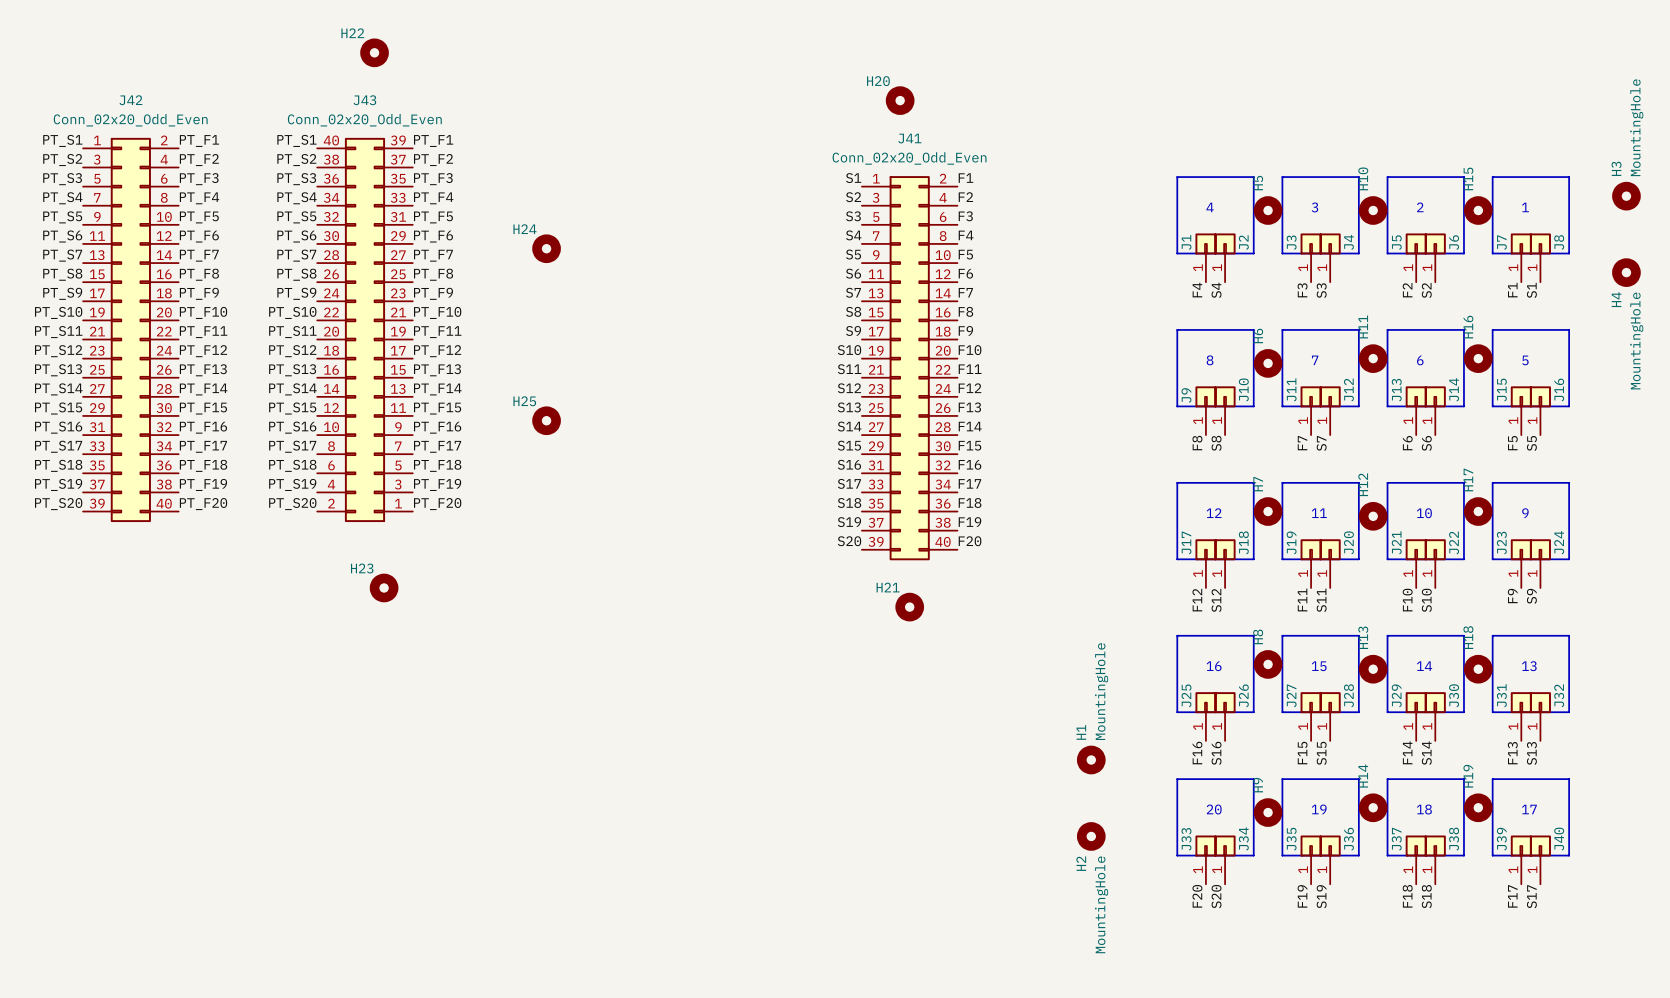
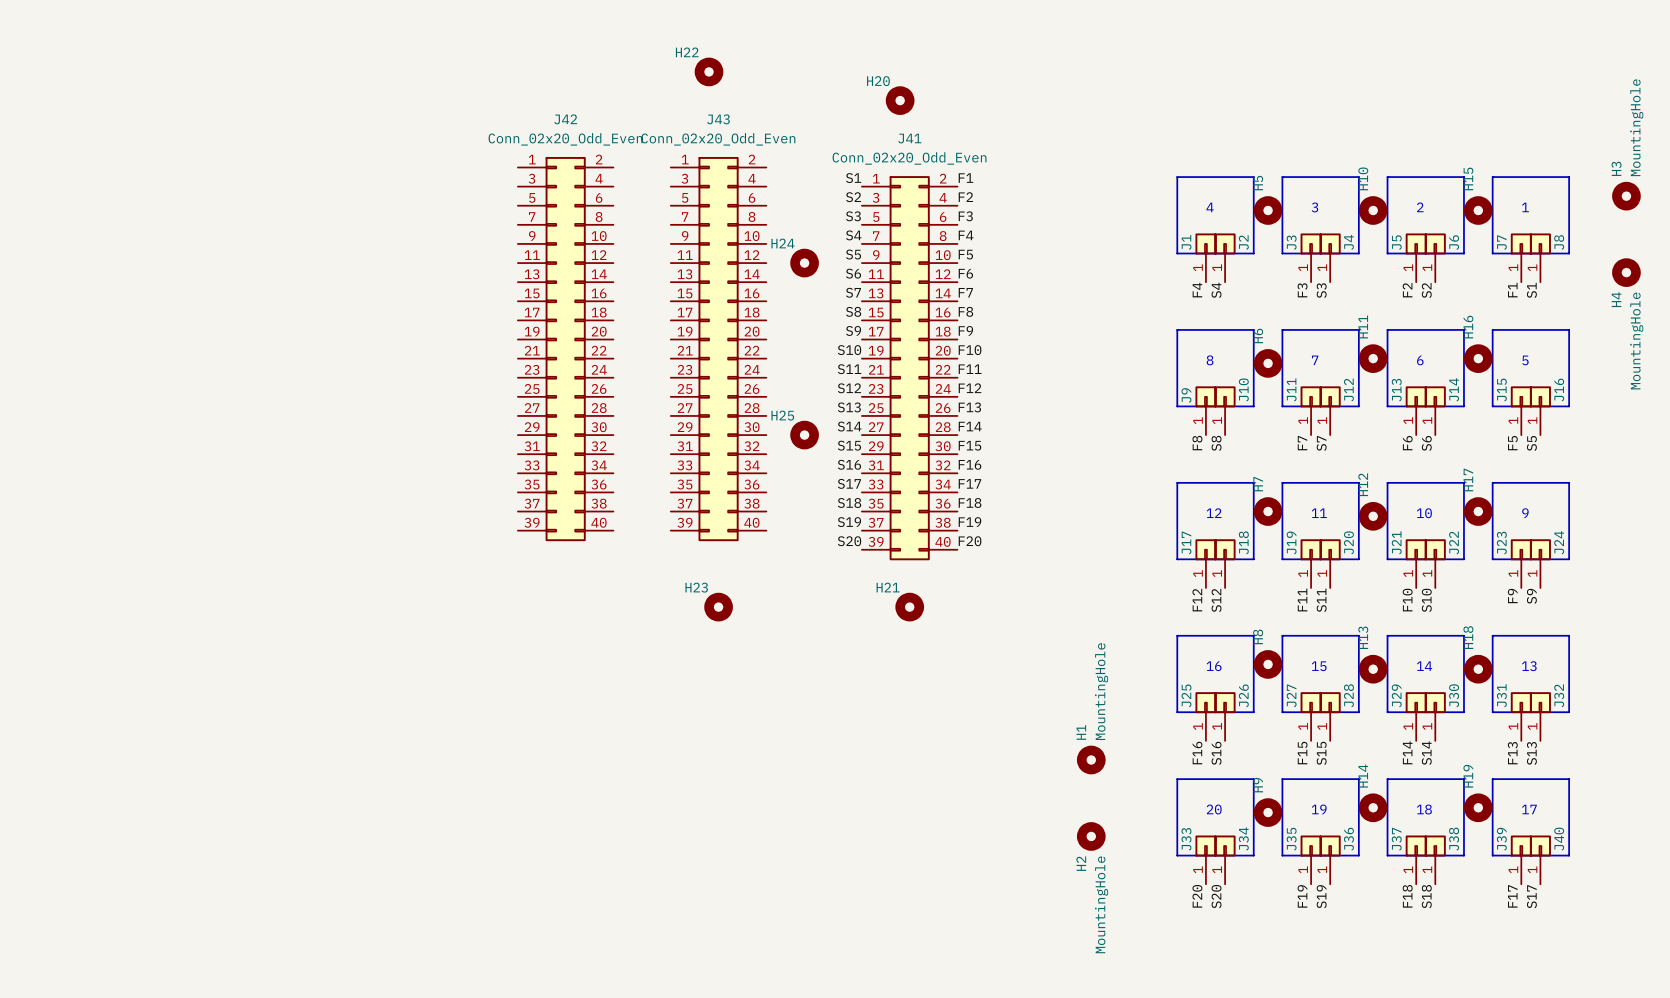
H22 position: (374, 52) -> (709, 71)
label: PT_S1 (62, 140) -> none
label: PT_S1 (296, 140) -> none
label: PT_F1 (199, 141) -> none
label: PT_F1 (433, 141) -> none
label: PT_S2 (62, 160) -> none
label: PT_F2 (199, 160) -> none
label: PT_S2 (296, 160) -> none
label: PT_F2 (433, 160) -> none
label: PT_S3 (62, 179) -> none
label: PT_F3 (199, 179) -> none
label: PT_S3 (296, 179) -> none
label: PT_F3 (433, 179) -> none
label: PT_S4 (62, 198) -> none
label: PT_F4 (199, 198) -> none
label: PT_S4 (297, 198) -> none
label: PT_F4 (433, 198) -> none
label: PT_S5 (62, 217) -> none
label: PT_F5 (199, 217) -> none
label: PT_S5 (296, 217) -> none
label: PT_F5 (433, 217) -> none
label: PT_S6 (62, 236) -> none
label: PT_F6 (199, 236) -> none
label: PT_S6 (296, 236) -> none
label: PT_F6 (433, 236) -> none
H24 position: (546, 248) -> (804, 263)
label: PT_S7 (62, 255) -> none
label: PT_F7 (199, 255) -> none
label: PT_S7 (296, 255) -> none
label: PT_F7 (433, 255) -> none
label: PT_S8 (62, 274) -> none
label: PT_F8 (199, 274) -> none
label: PT_S8 (296, 274) -> none
label: PT_F8 (433, 274) -> none
label: PT_S9 (62, 293) -> none
label: PT_F9 (199, 293) -> none
label: PT_S9 (296, 293) -> none
label: PT_F9 (433, 293) -> none
label: PT_S10 (58, 312) -> none
label: PT_F10 (203, 312) -> none
label: PT_S10 (292, 312) -> none
label: PT_F10 (437, 312) -> none
J42 position: (130, 329) -> (565, 349)
J43 rotation: 0° (364, 329) -> 180° (718, 349)
J43 position: (364, 329) -> (718, 349)
label: PT_S11 (58, 332) -> none
label: PT_F11 (203, 332) -> none
label: PT_S11 (292, 332) -> none
label: PT_F11 (437, 332) -> none
label: PT_S12 (58, 351) -> none
label: PT_F12 (203, 351) -> none
label: PT_S12 (292, 351) -> none
label: PT_F12 (437, 351) -> none
label: PT_S13 (58, 370) -> none
label: PT_F13 (203, 370) -> none
label: PT_S13 (292, 370) -> none
label: PT_F13 (437, 370) -> none
label: PT_S14 (58, 389) -> none
label: PT_F14 (203, 389) -> none
label: PT_S14 (292, 389) -> none
label: PT_F14 (437, 389) -> none
label: PT_S15 (58, 408) -> none
label: PT_F15 (203, 408) -> none
label: PT_S15 (292, 408) -> none
label: PT_F15 (437, 408) -> none
H25 position: (546, 420) -> (804, 435)
label: PT_S16 (58, 427) -> none
label: PT_F16 (203, 427) -> none
label: PT_S16 (292, 427) -> none
label: PT_F16 (437, 427) -> none
label: PT_S17 (58, 446) -> none
label: PT_F17 (203, 446) -> none
label: PT_S17 (292, 446) -> none
label: PT_F17 (437, 446) -> none
label: PT_S18 (58, 465) -> none
label: PT_F18 (203, 465) -> none
label: PT_S18 (292, 465) -> none
label: PT_F18 (437, 465) -> none
label: PT_S19 (58, 484) -> none
label: PT_F19 (203, 484) -> none
label: PT_S19 (292, 484) -> none
label: PT_F19 (437, 484) -> none
label: PT_S20 (58, 504) -> none
label: PT_F20 (203, 504) -> none
label: PT_S20 (292, 504) -> none
label: PT_F20 (437, 504) -> none
H23 position: (384, 587) -> (718, 607)

